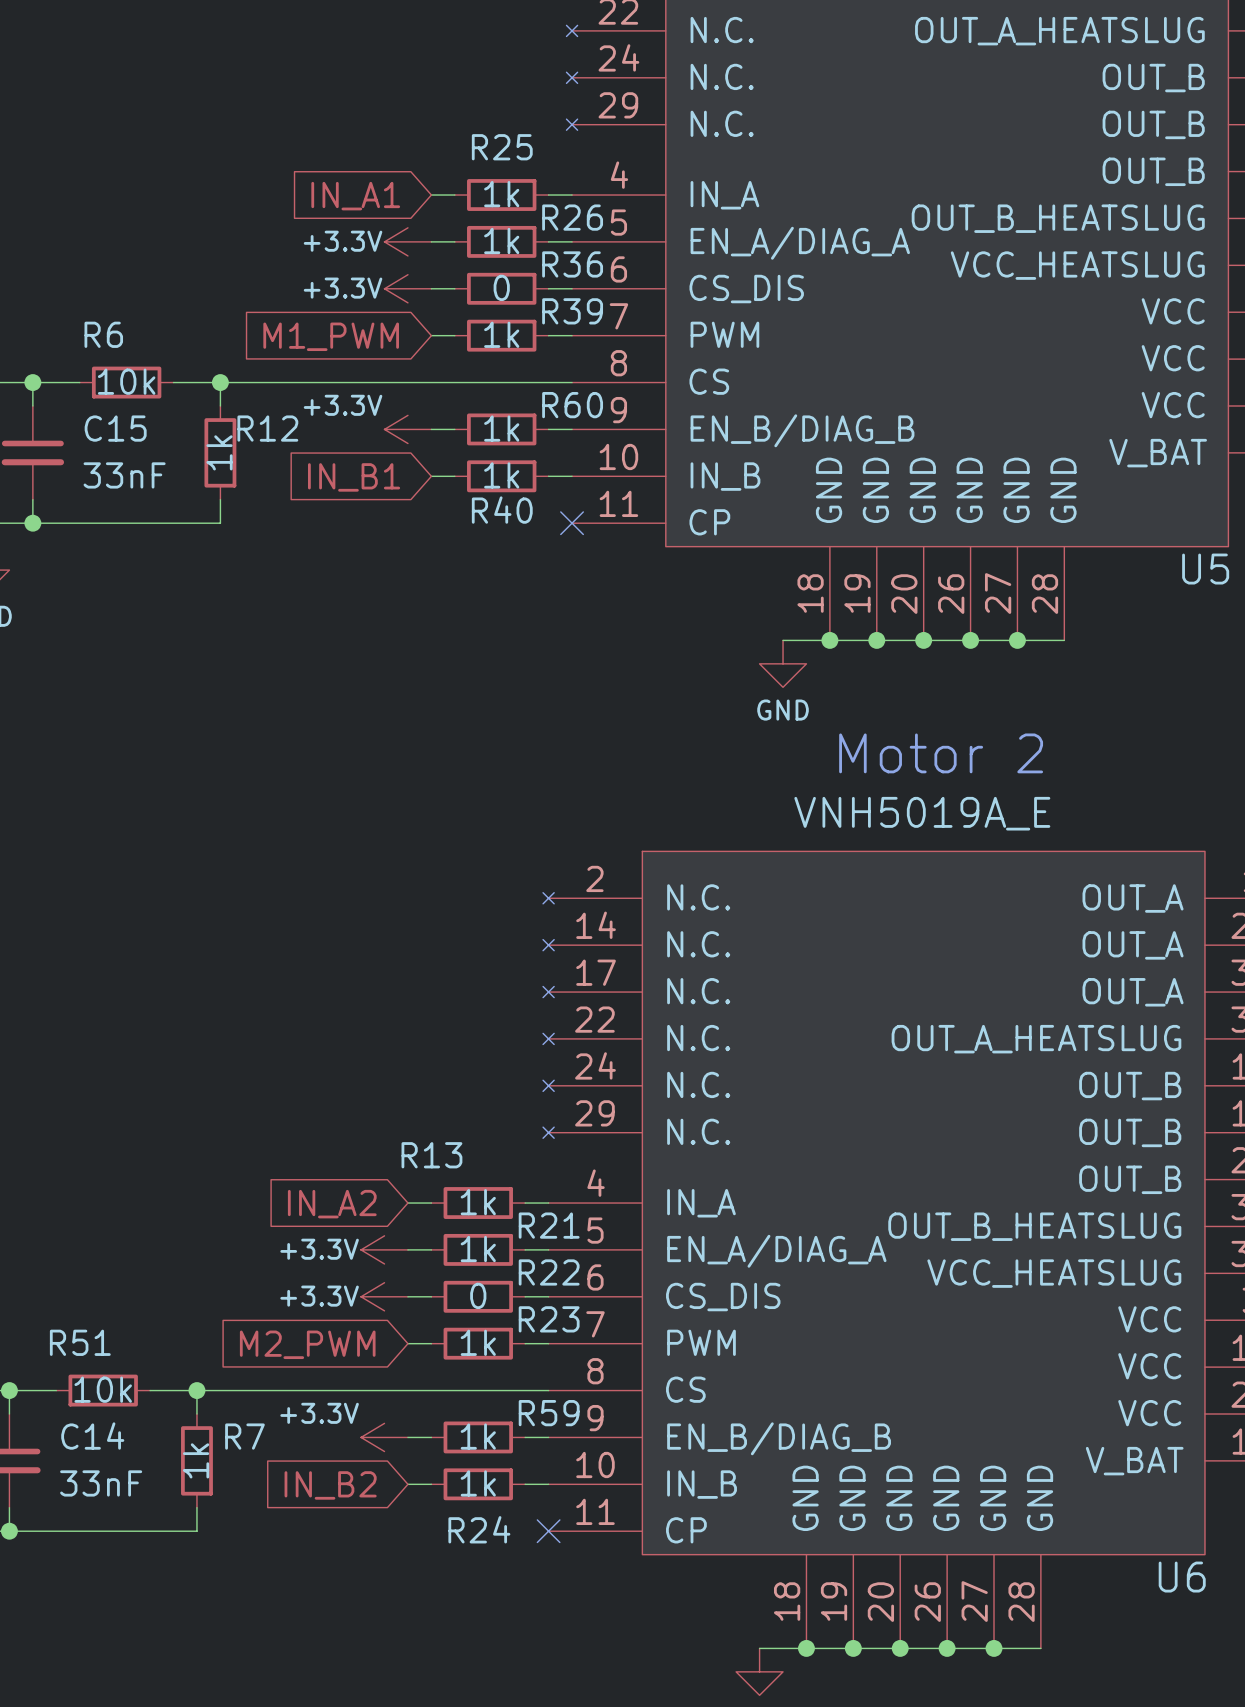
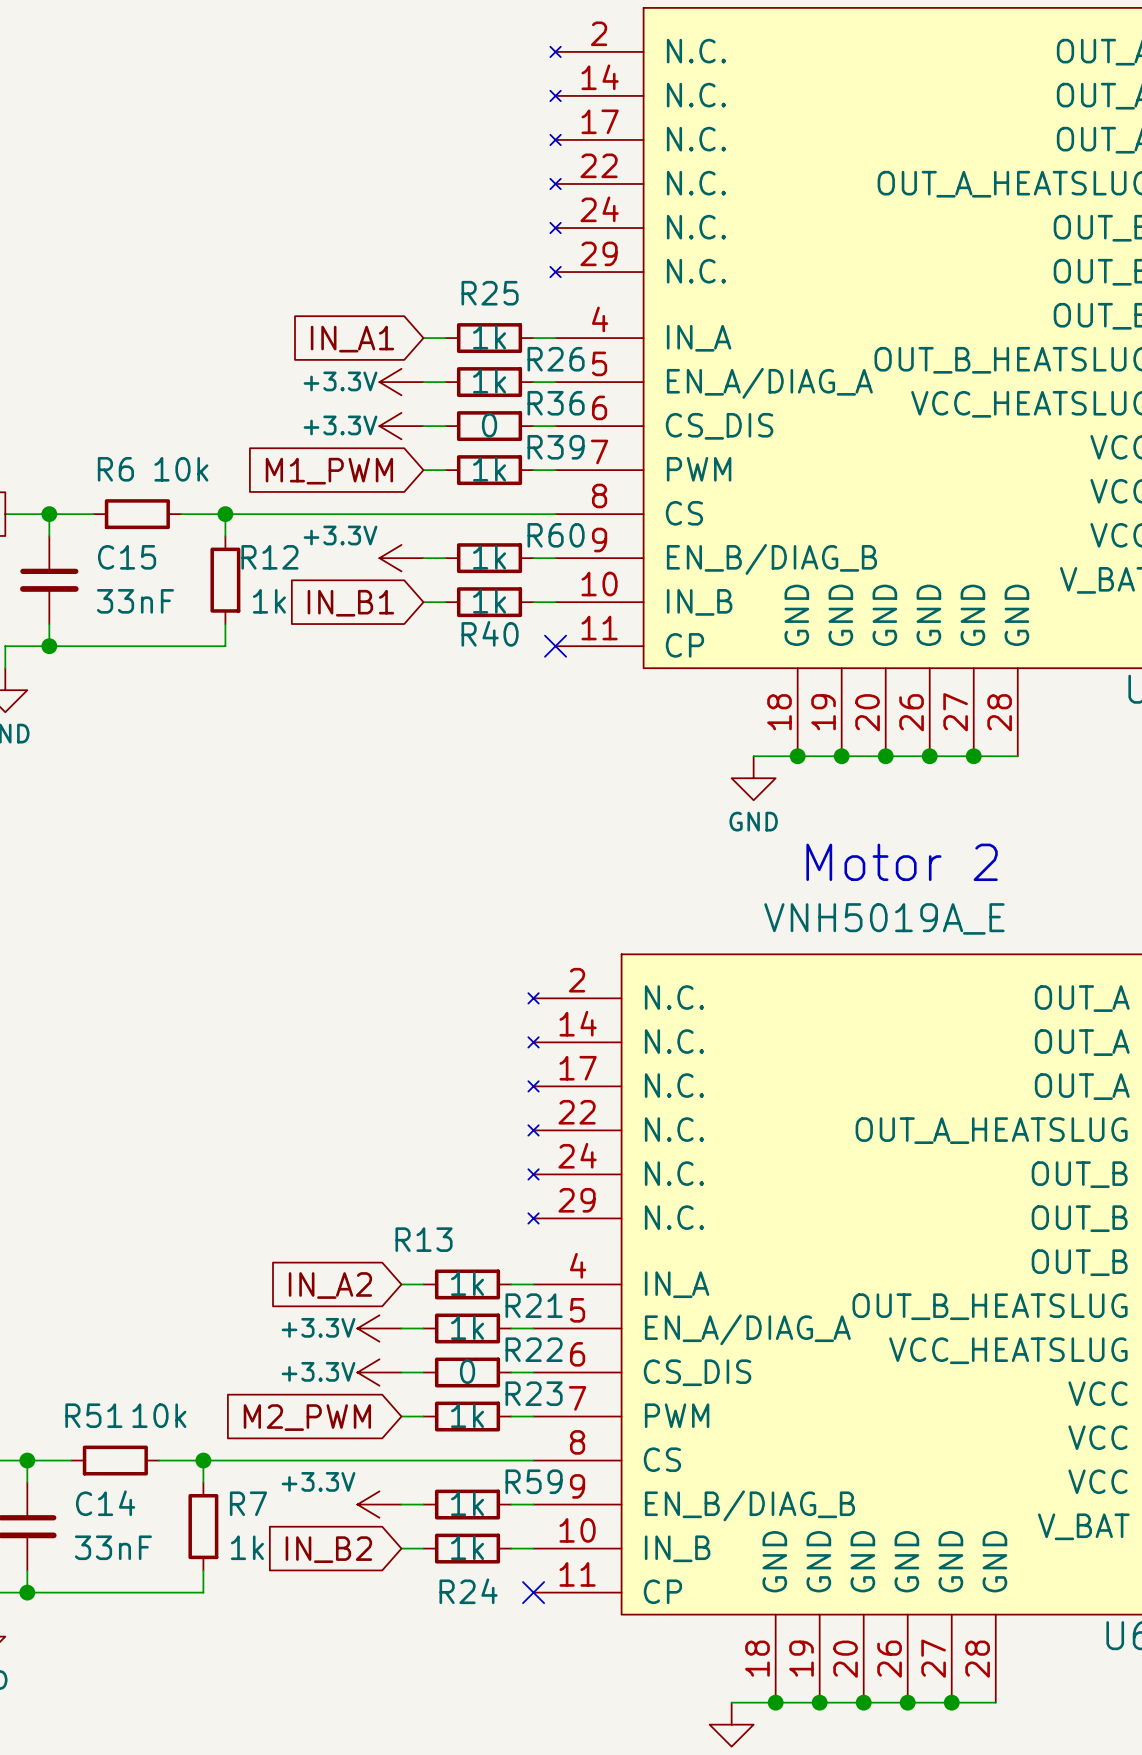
R6 value position: 10k (126, 381) -> 10k (181, 469)
R12 value rotation: 0° (219, 452) -> 90° clockwise (269, 601)
R51 value position: 10k (103, 1389) -> 10k (159, 1415)
R7 value rotation: 0° (196, 1460) -> 90° clockwise (247, 1547)

